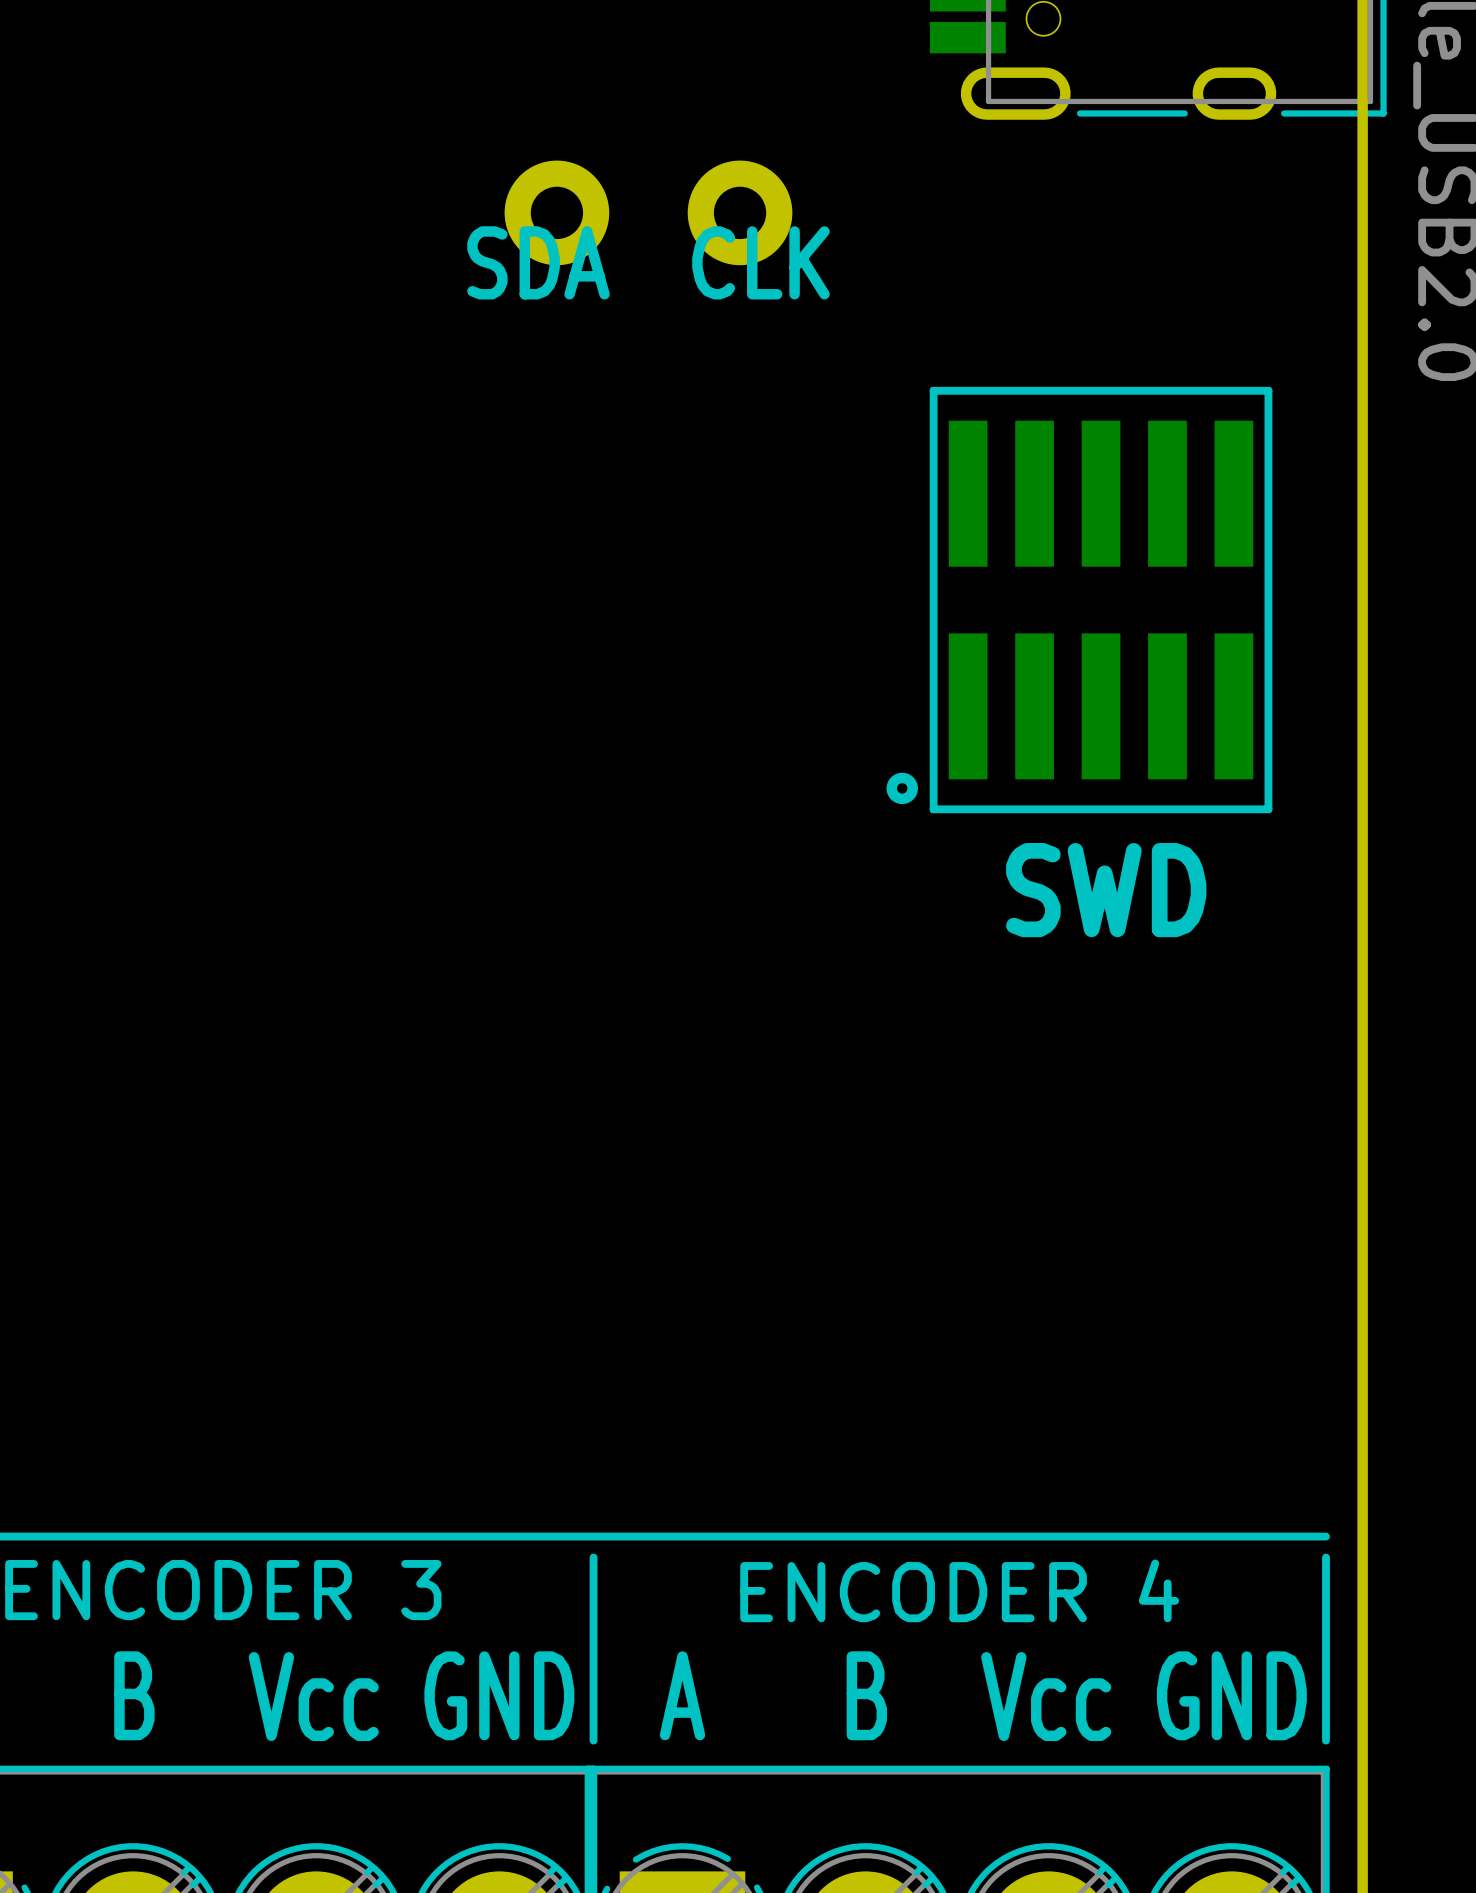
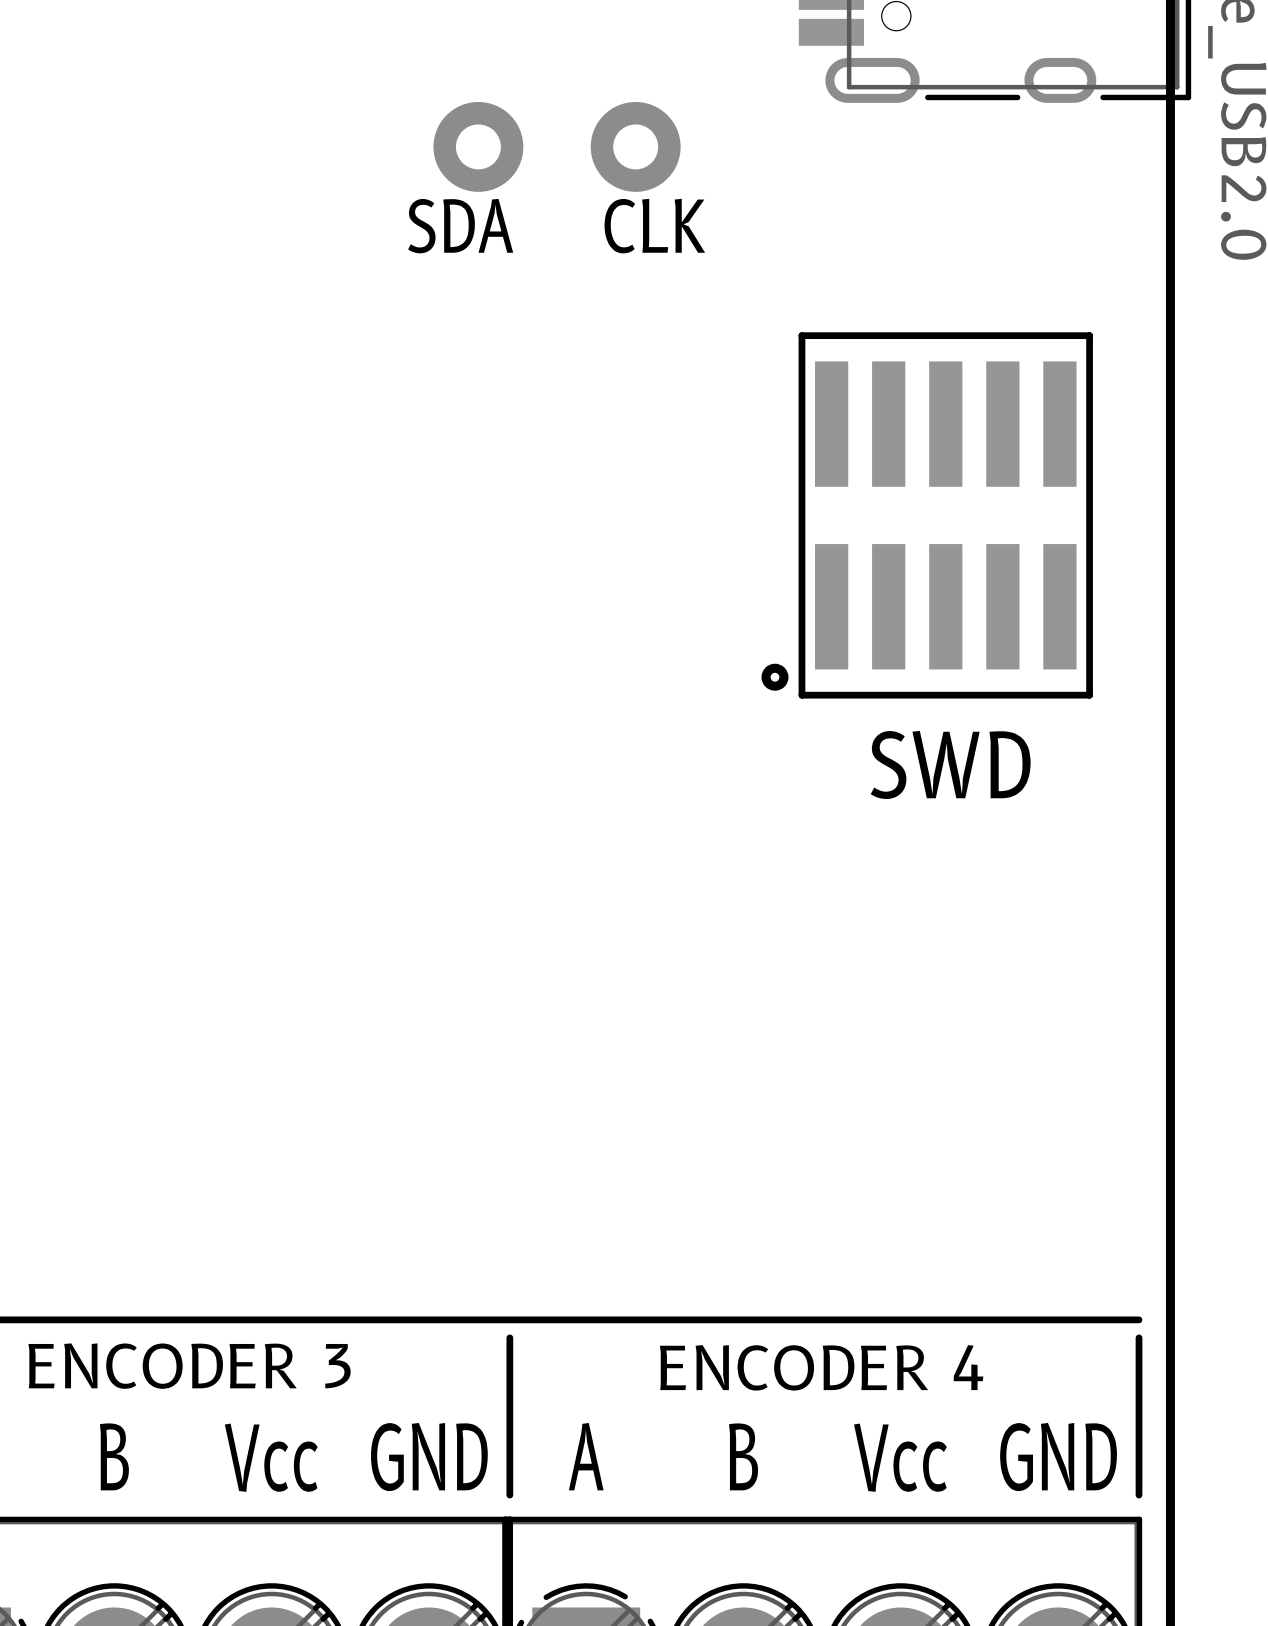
part position: (556, 212) -> (478, 146)
part position: (740, 212) -> (635, 146)

